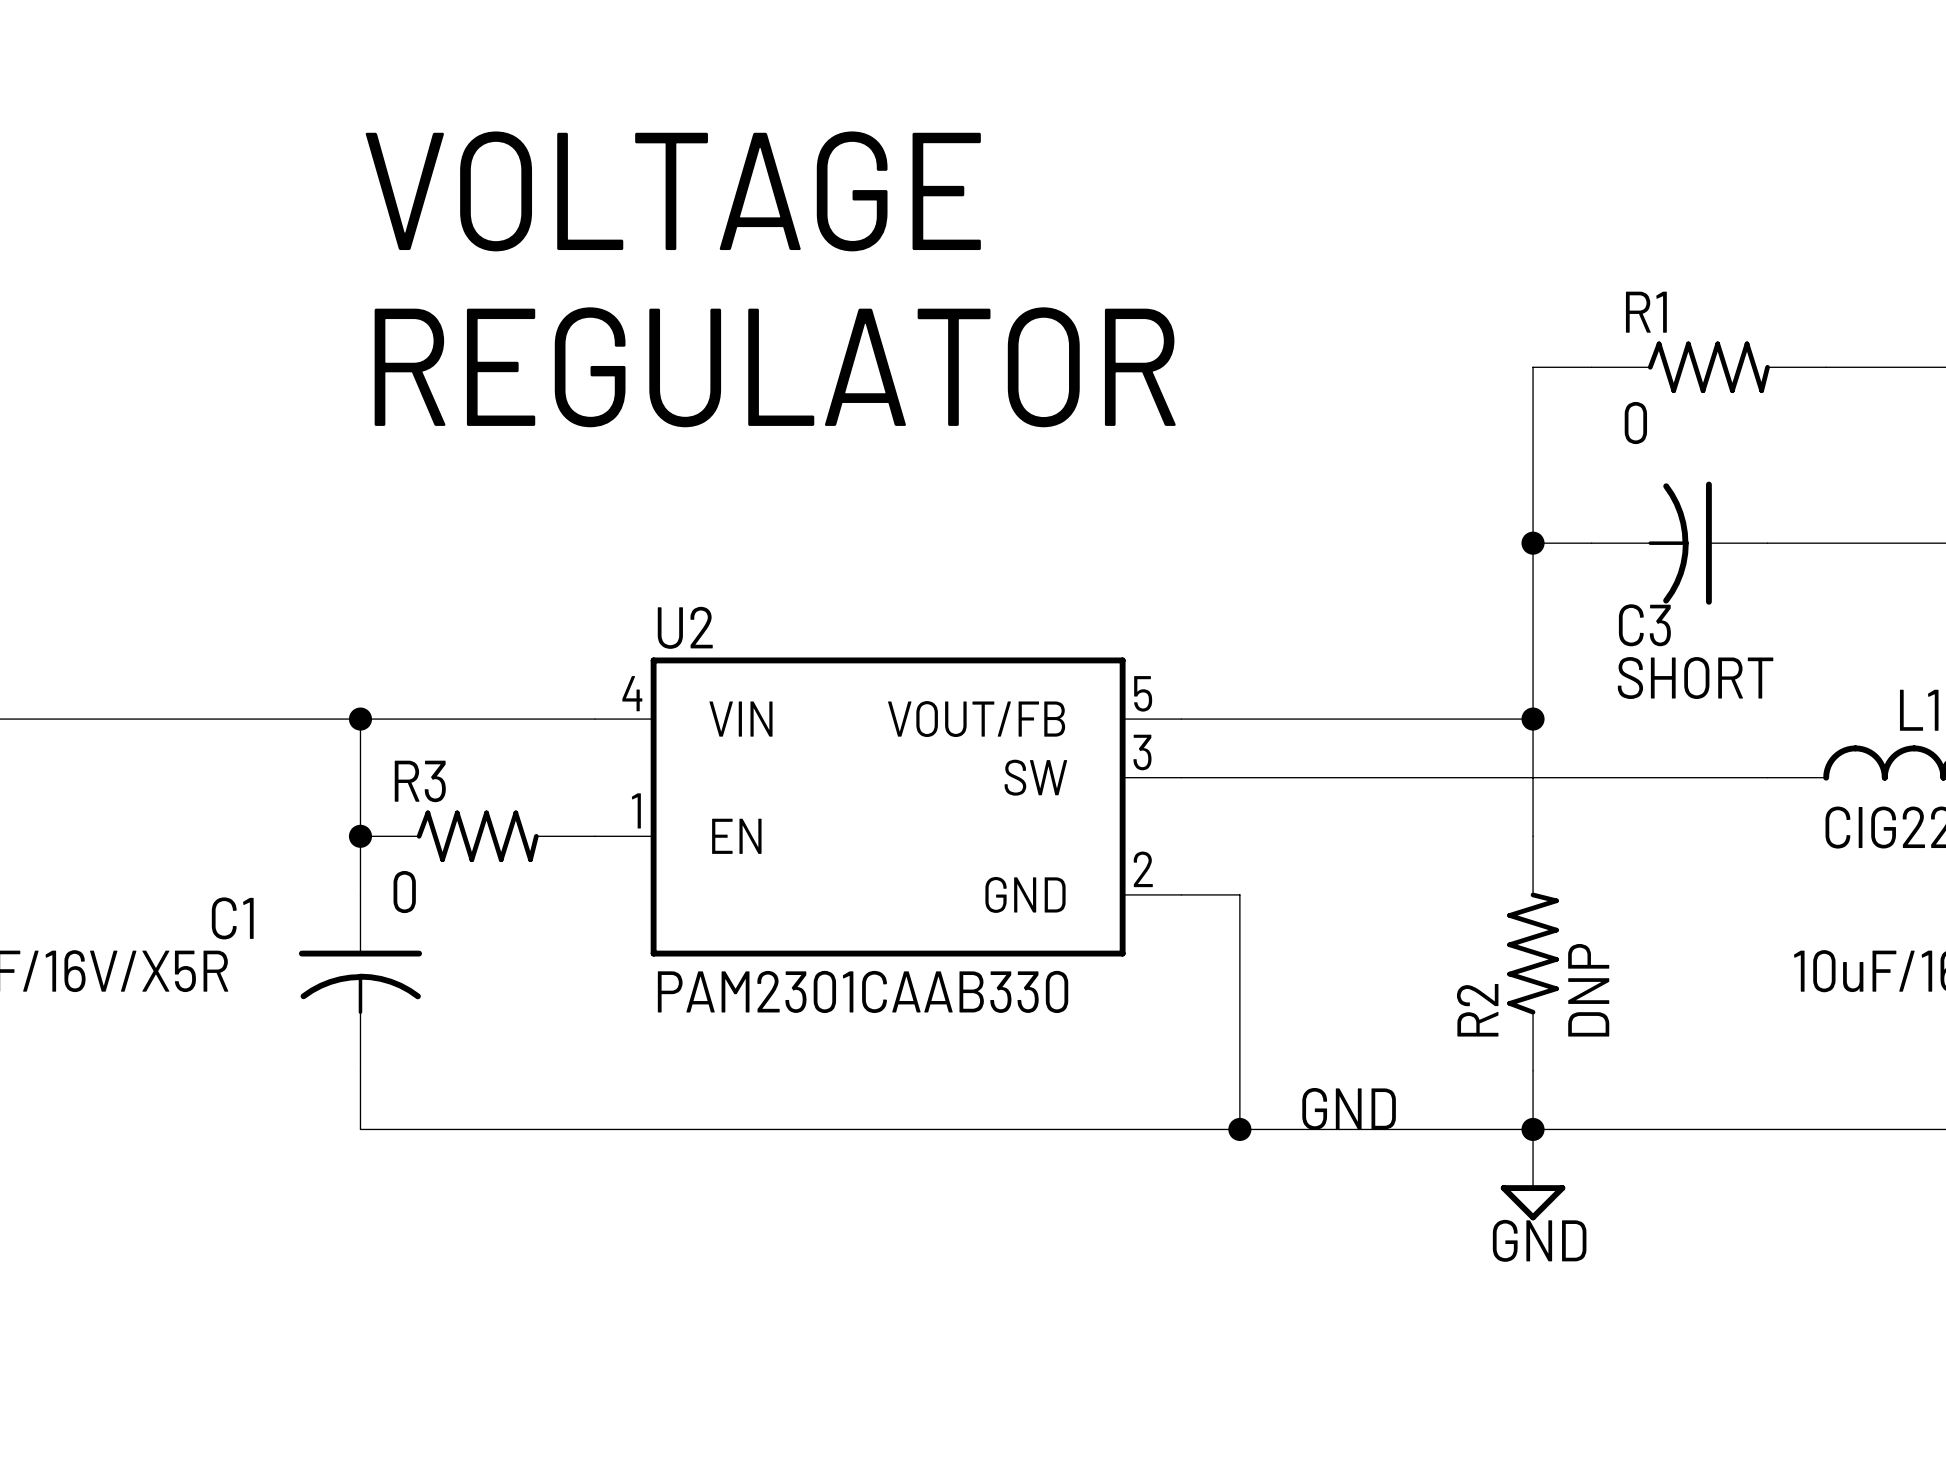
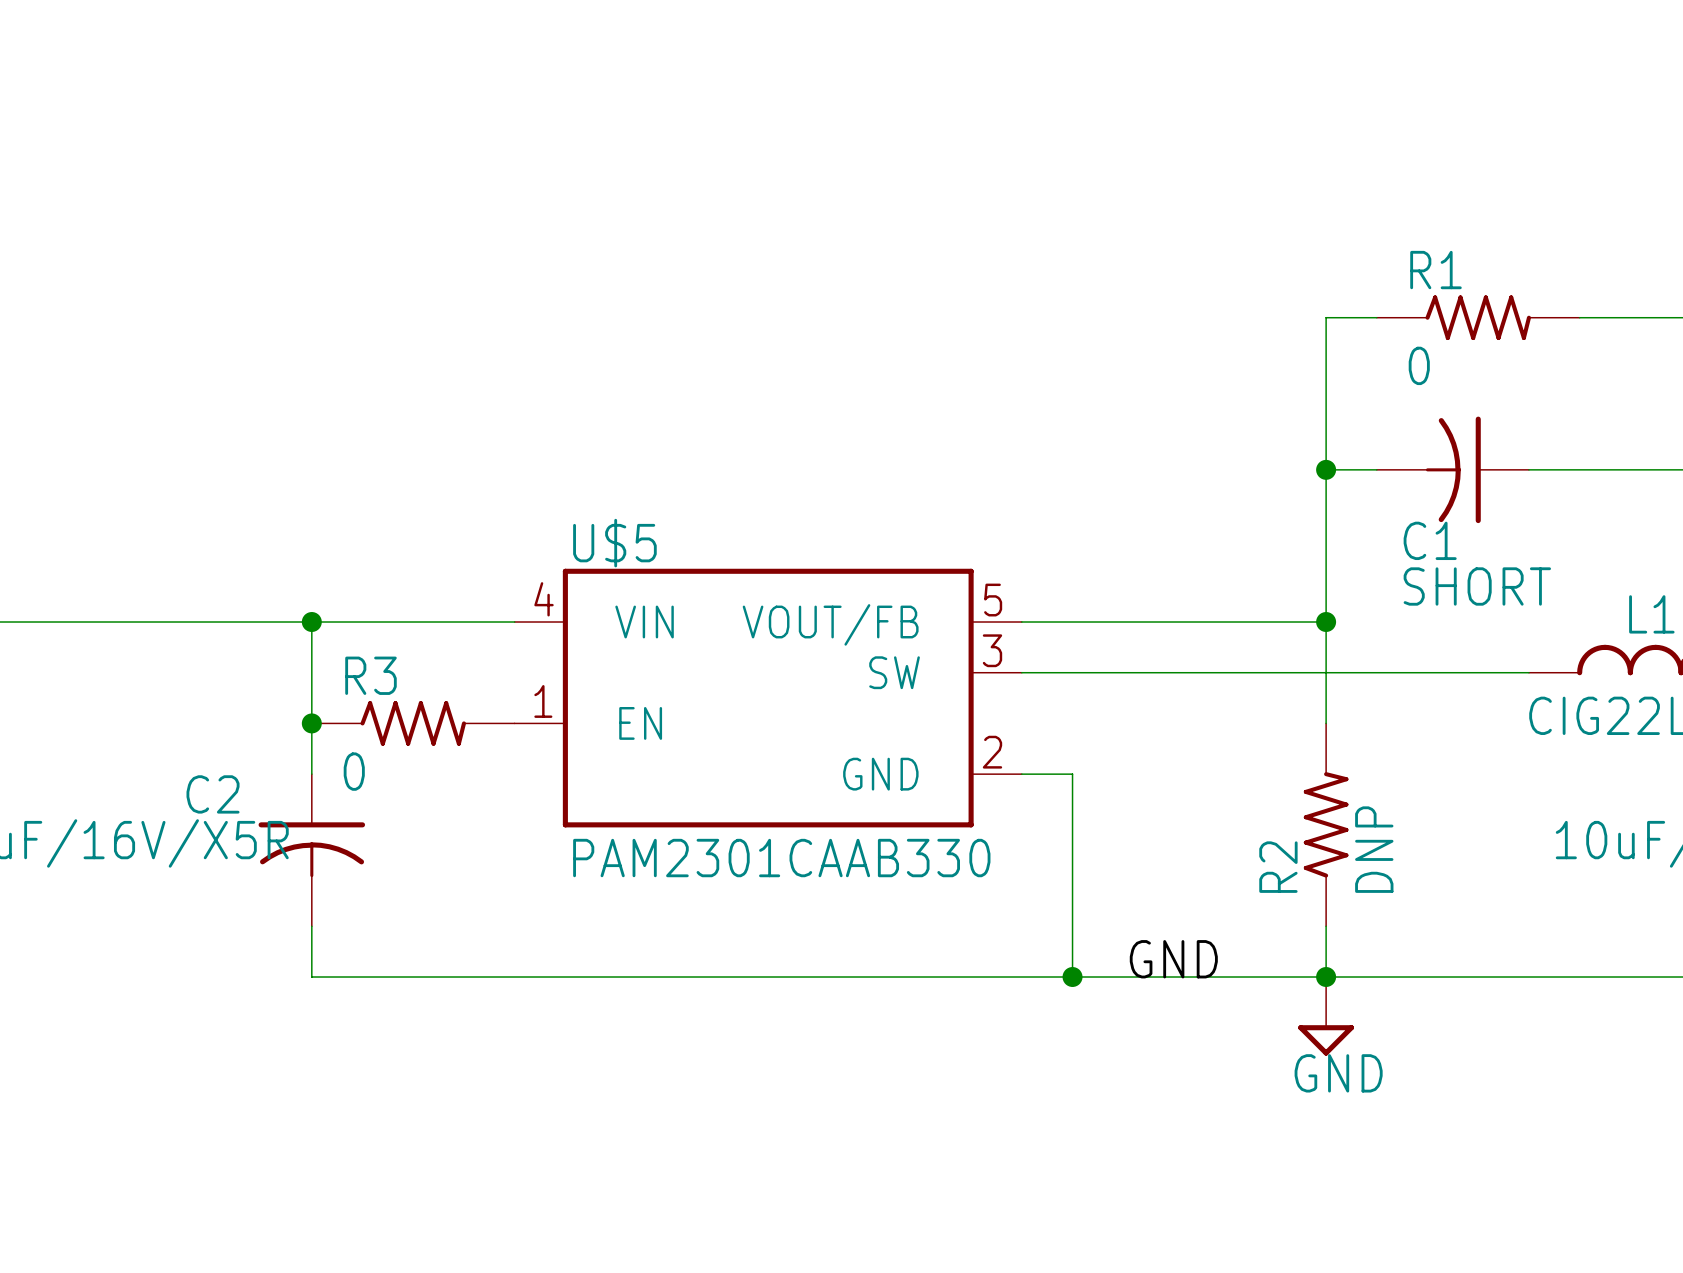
text: VOLTAGE (673, 191) -> none
text: REGULATOR (775, 367) -> none
C3 name: C3 (1644, 625) -> C1 (1430, 540)
U2 name: U2 (685, 627) -> U$5 (614, 543)
C1 name: C1 (232, 918) -> C2 (213, 794)

